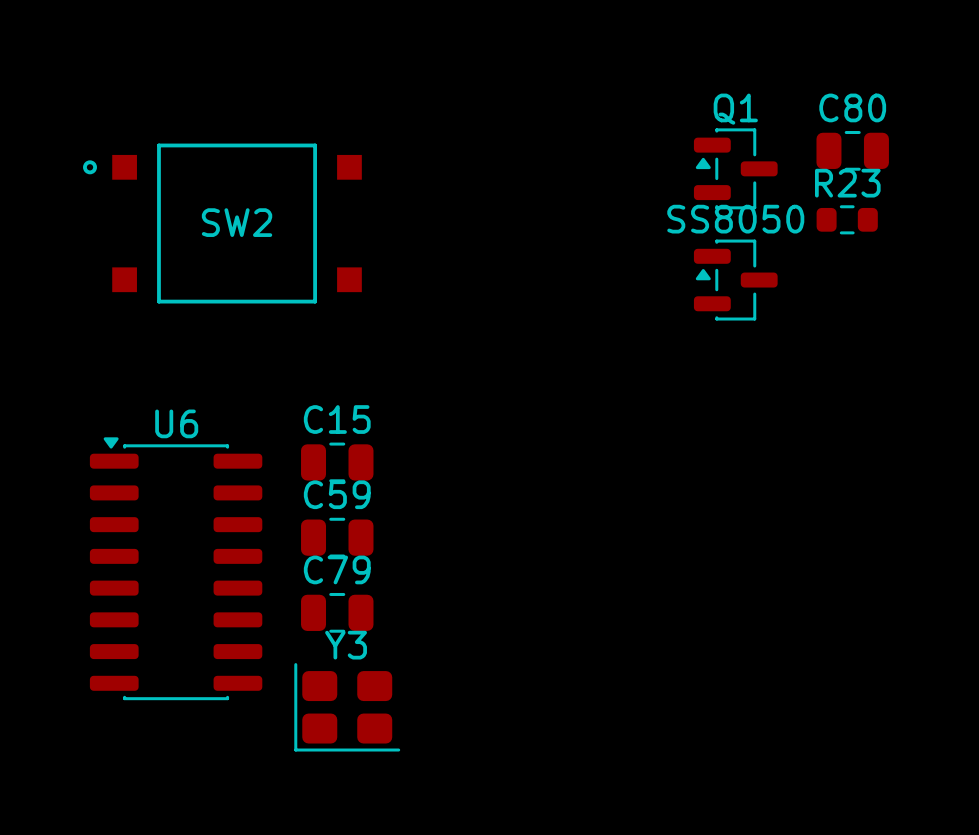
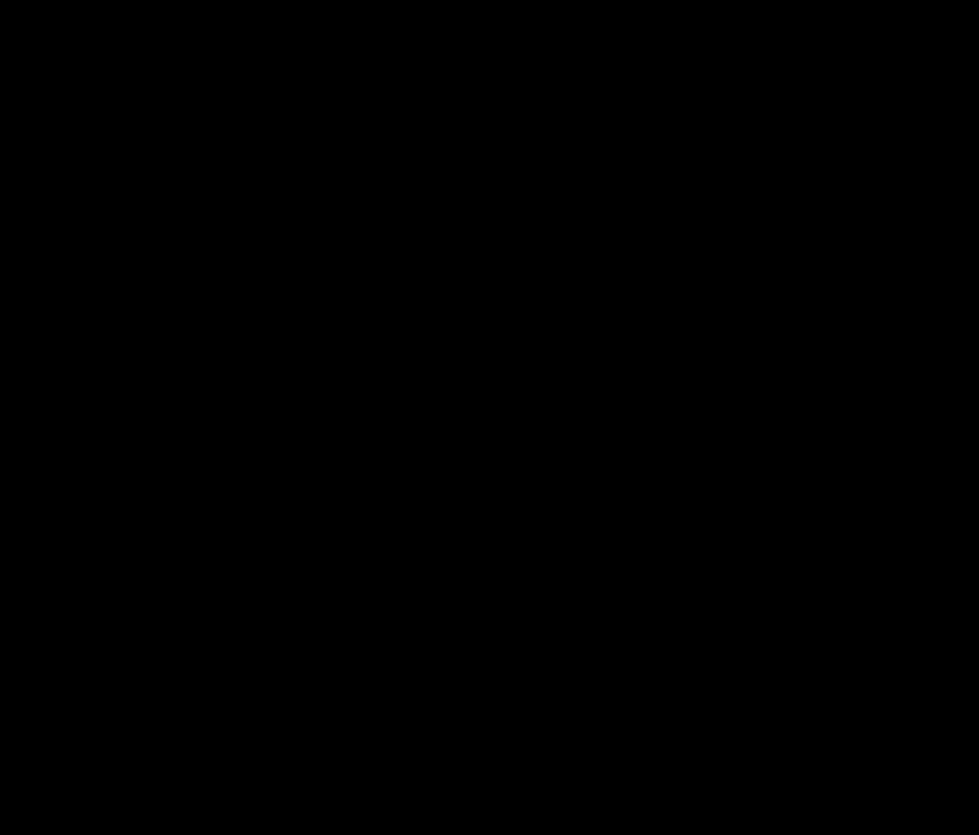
C80: (852, 150) -> none
Q1: (735, 168) -> none
R23: (847, 219) -> none
SW2: (222, 223) -> none
SS8050: (735, 280) -> none
C15: (337, 462) -> none
C59: (337, 537) -> none
U6: (176, 568) -> none
C79: (337, 612) -> none
Y3: (347, 707) -> none

